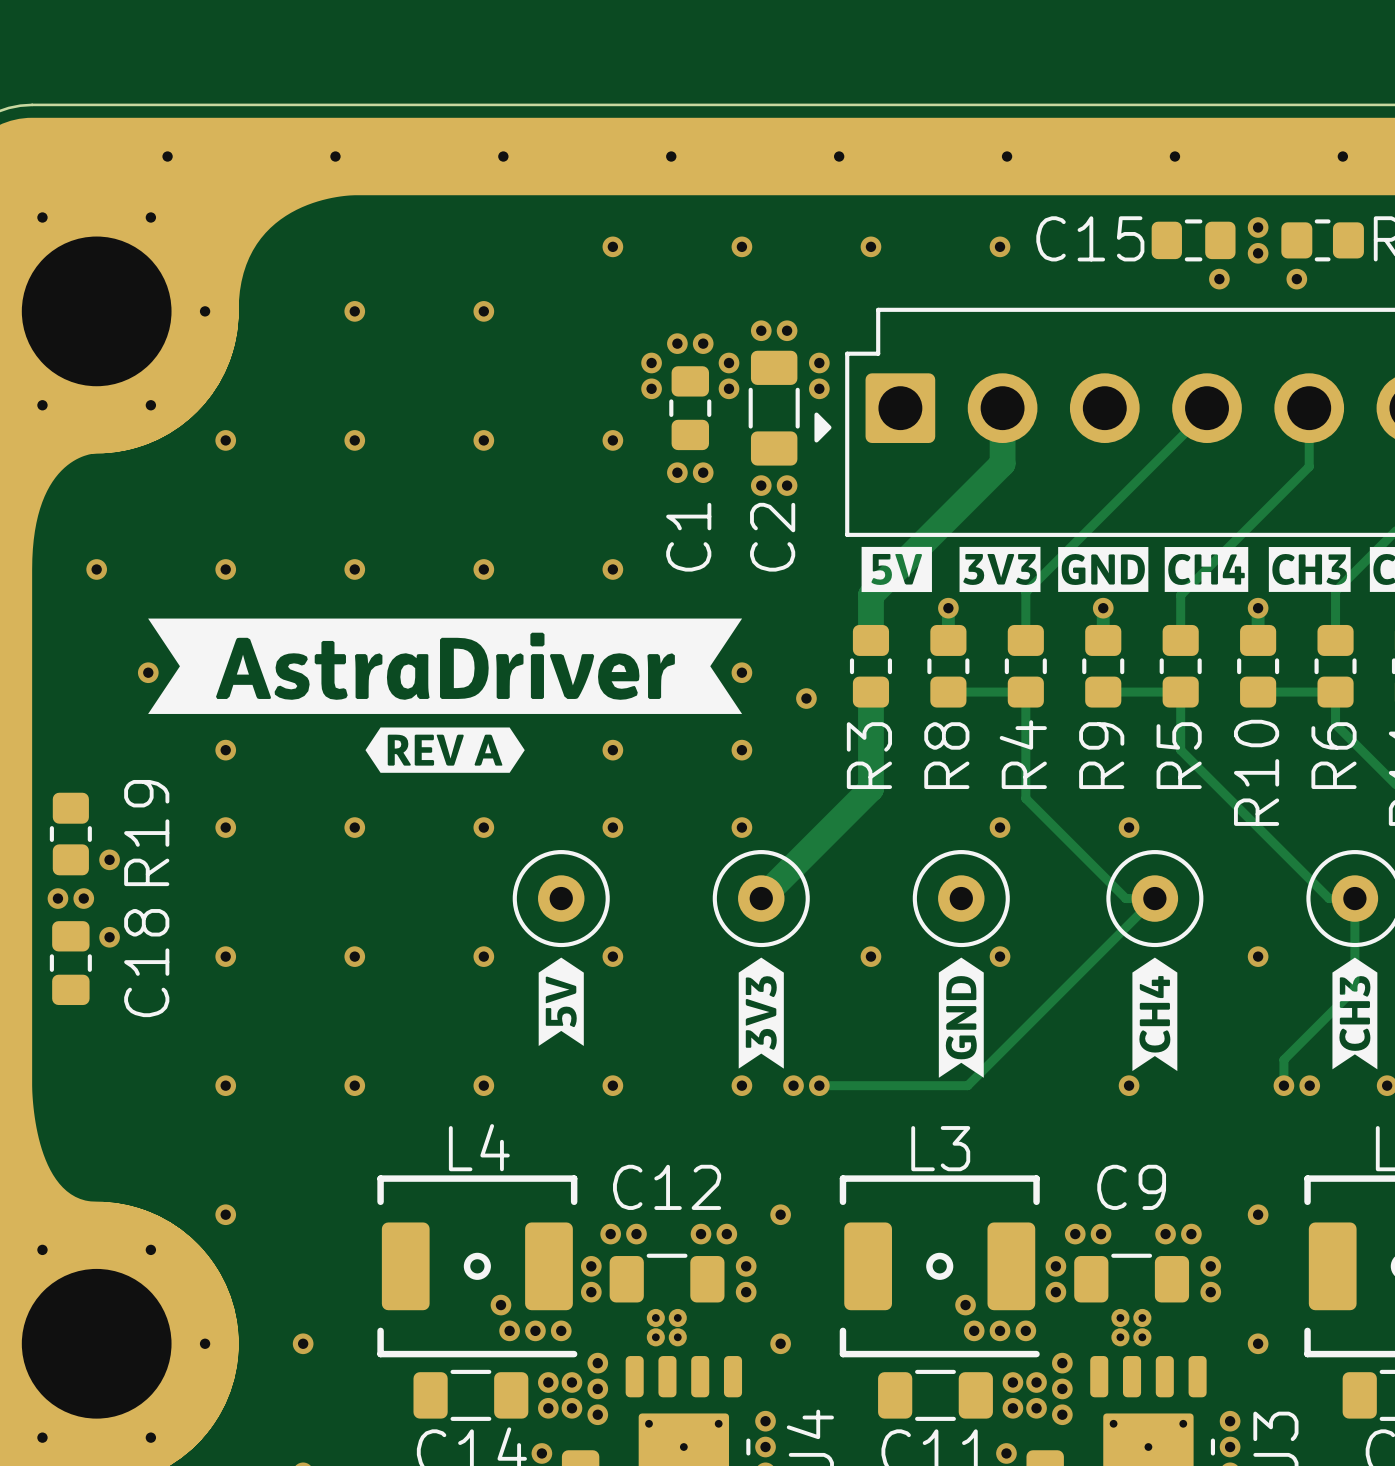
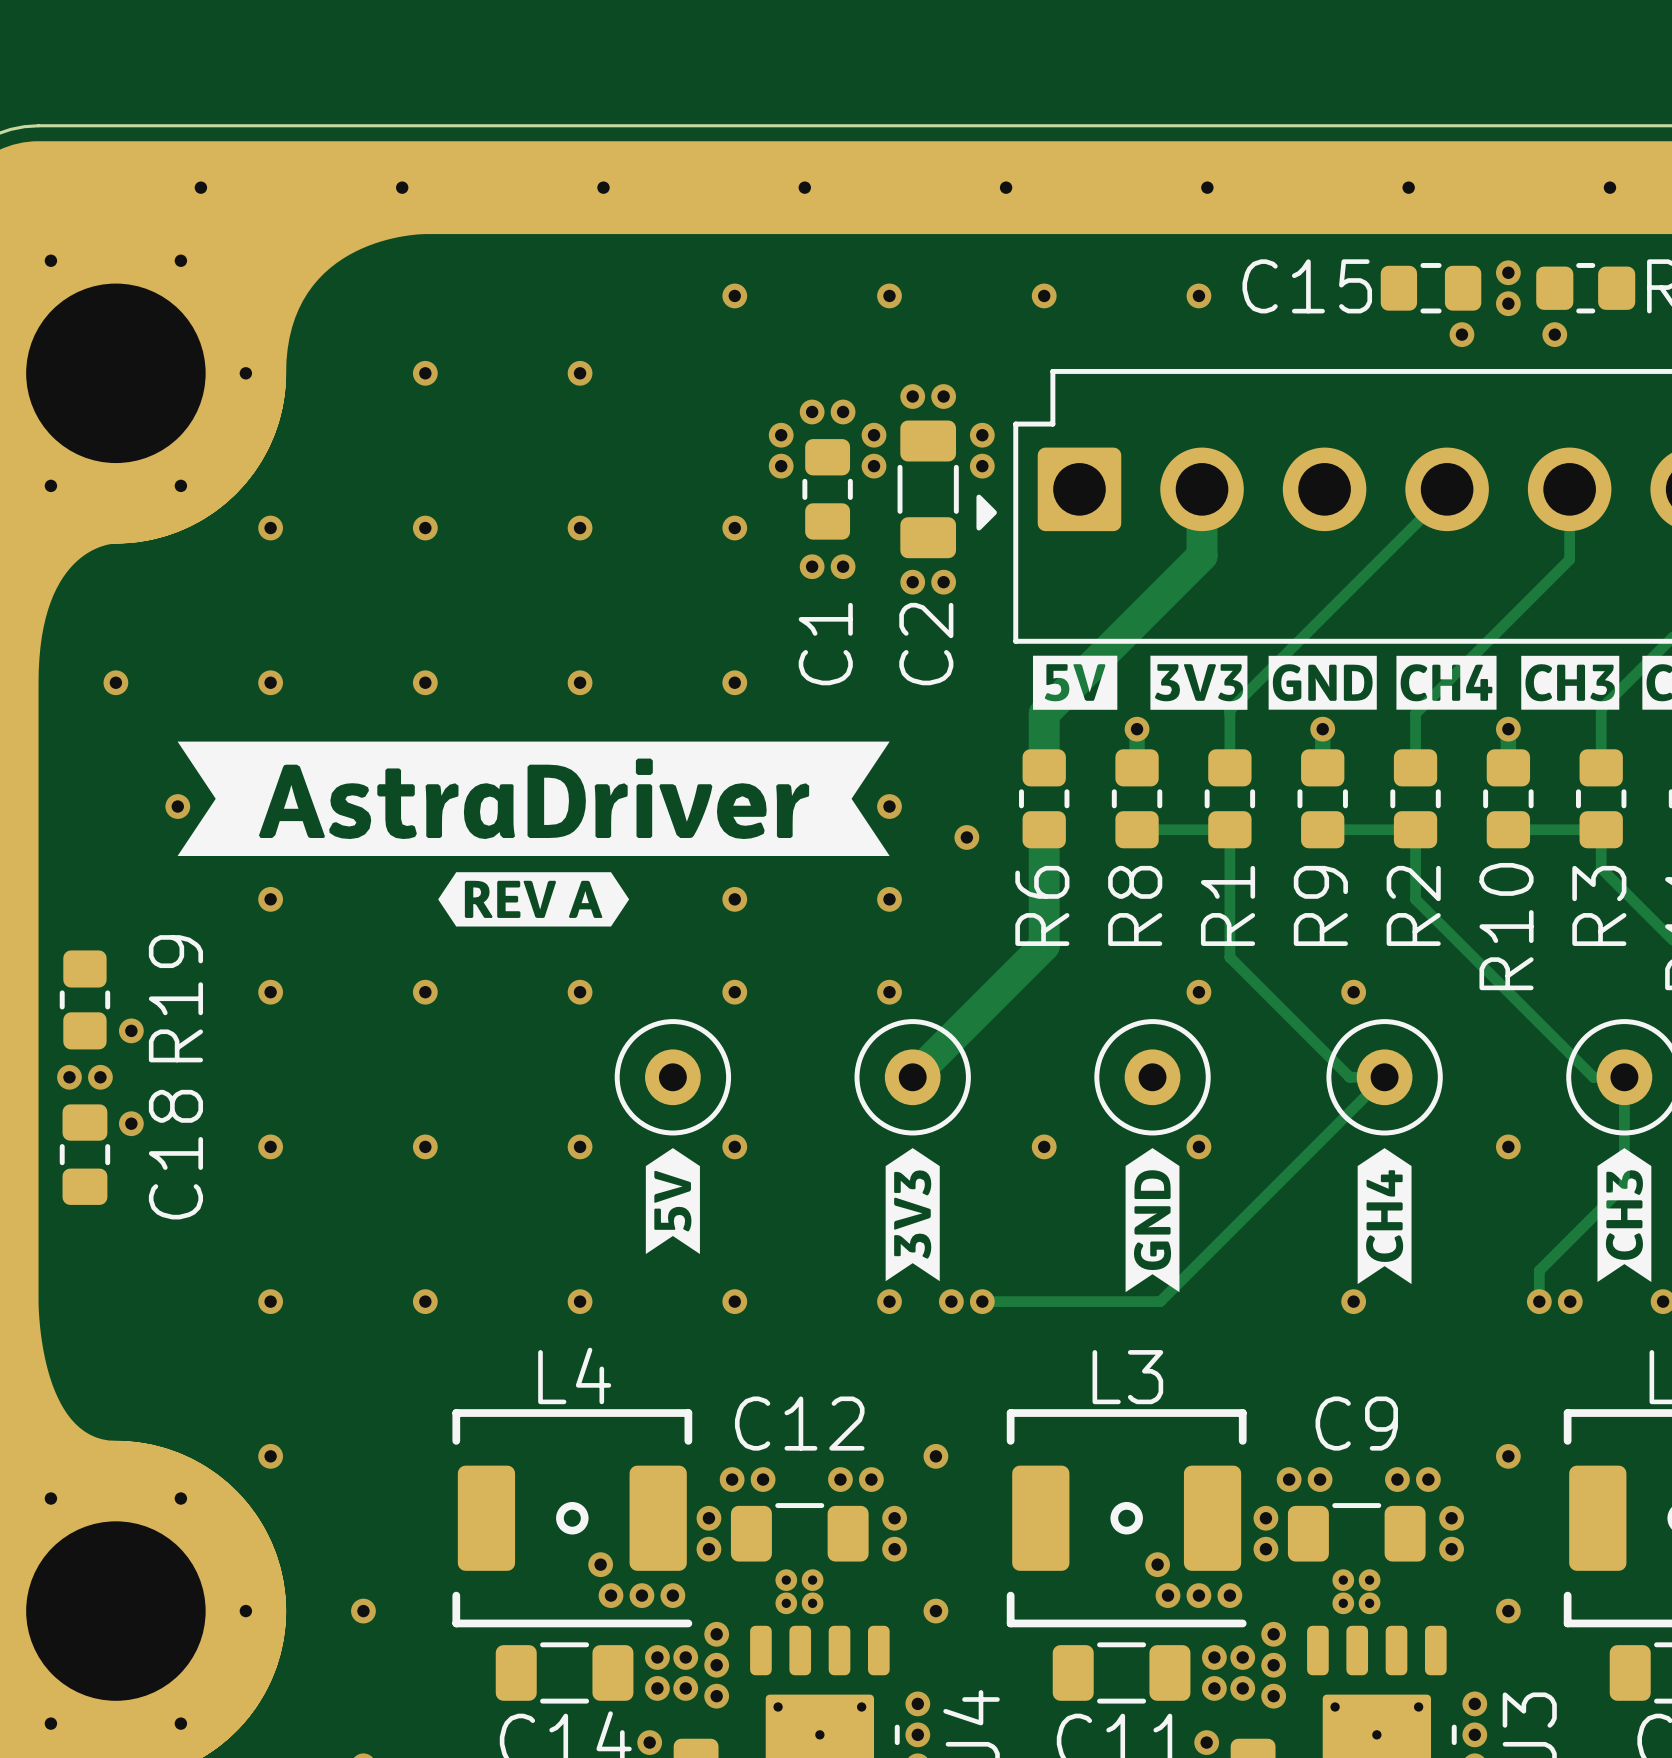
R4 name: R4 (1023, 754) -> R1 (1228, 905)
R3 name: R3 (869, 755) -> R6 (1042, 905)
R5 name: R5 (1179, 755) -> R2 (1413, 905)
R6 name: R6 (1334, 755) -> R3 (1599, 905)

